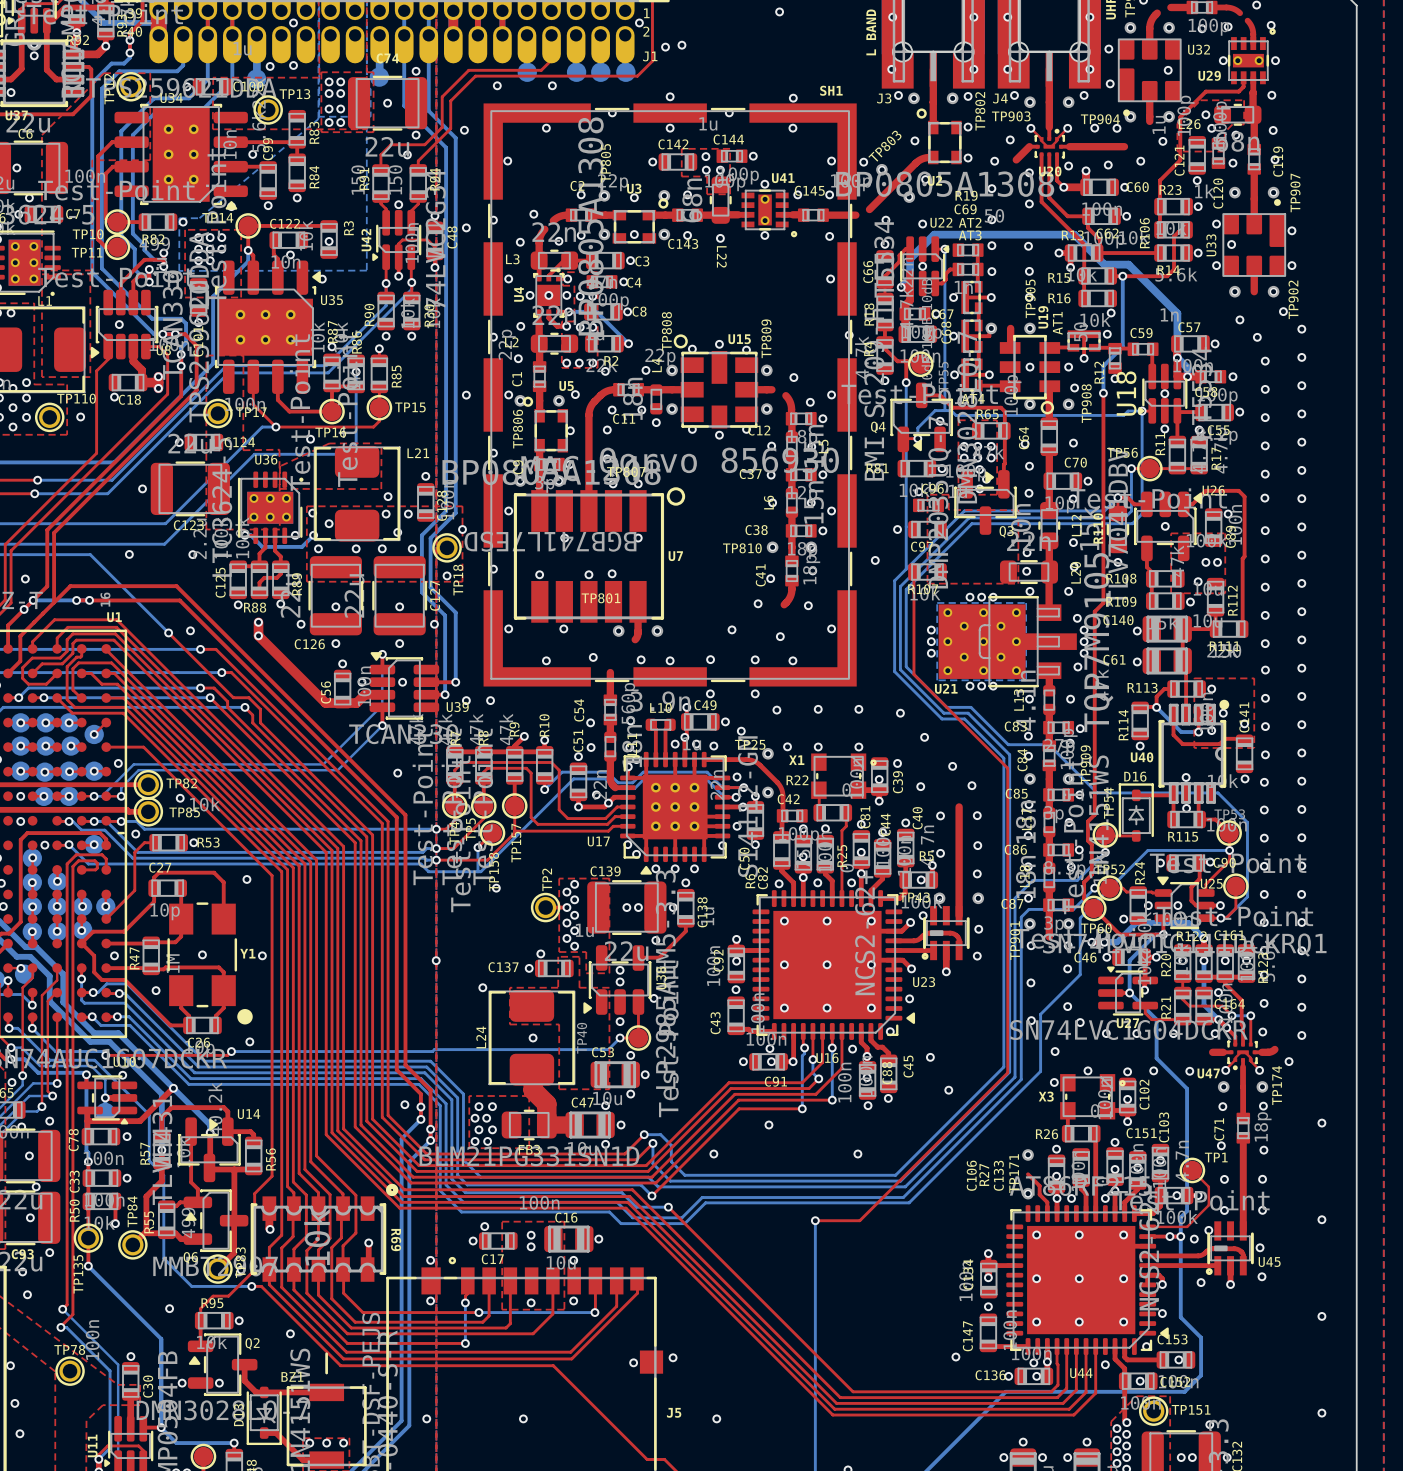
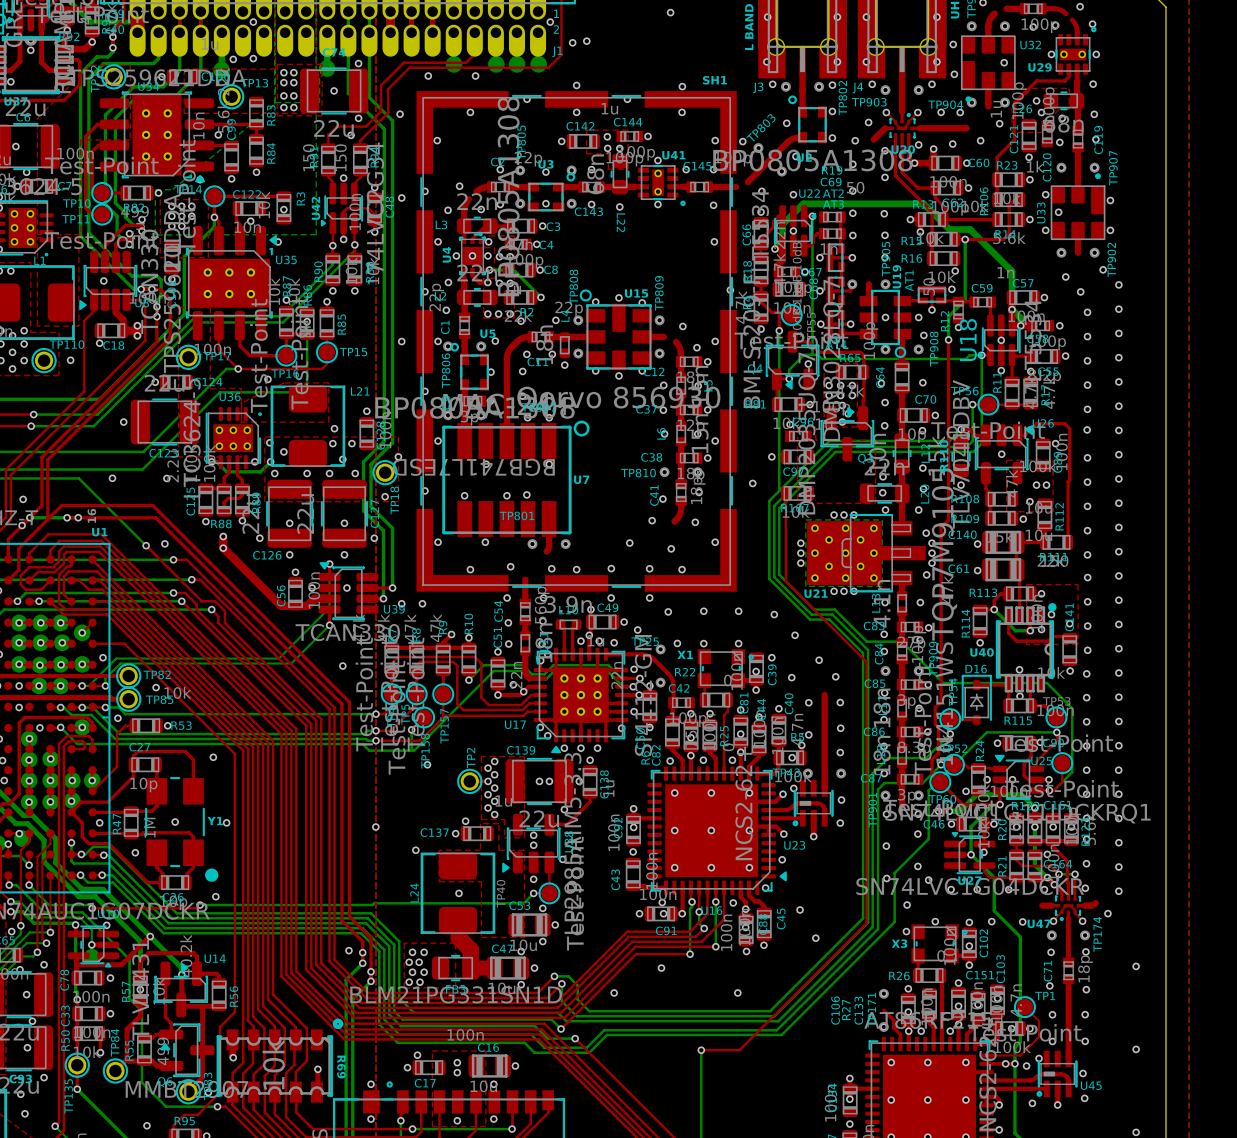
via: none -> (507, 597)
via: none -> (543, 597)

